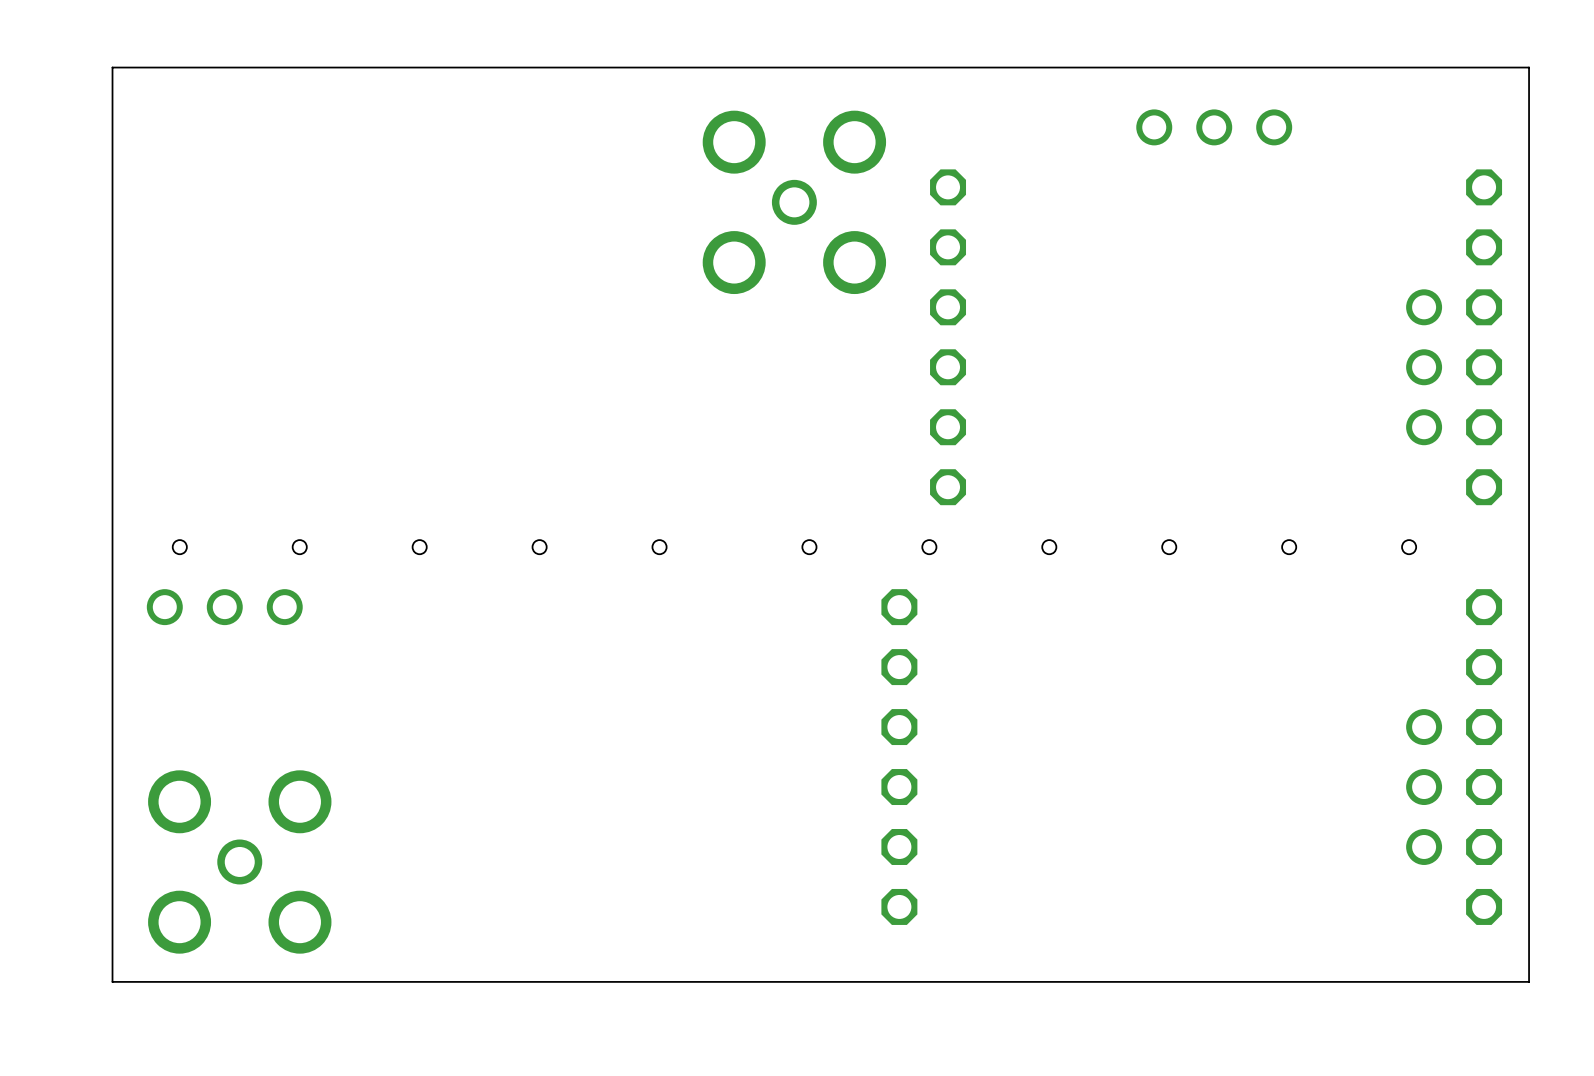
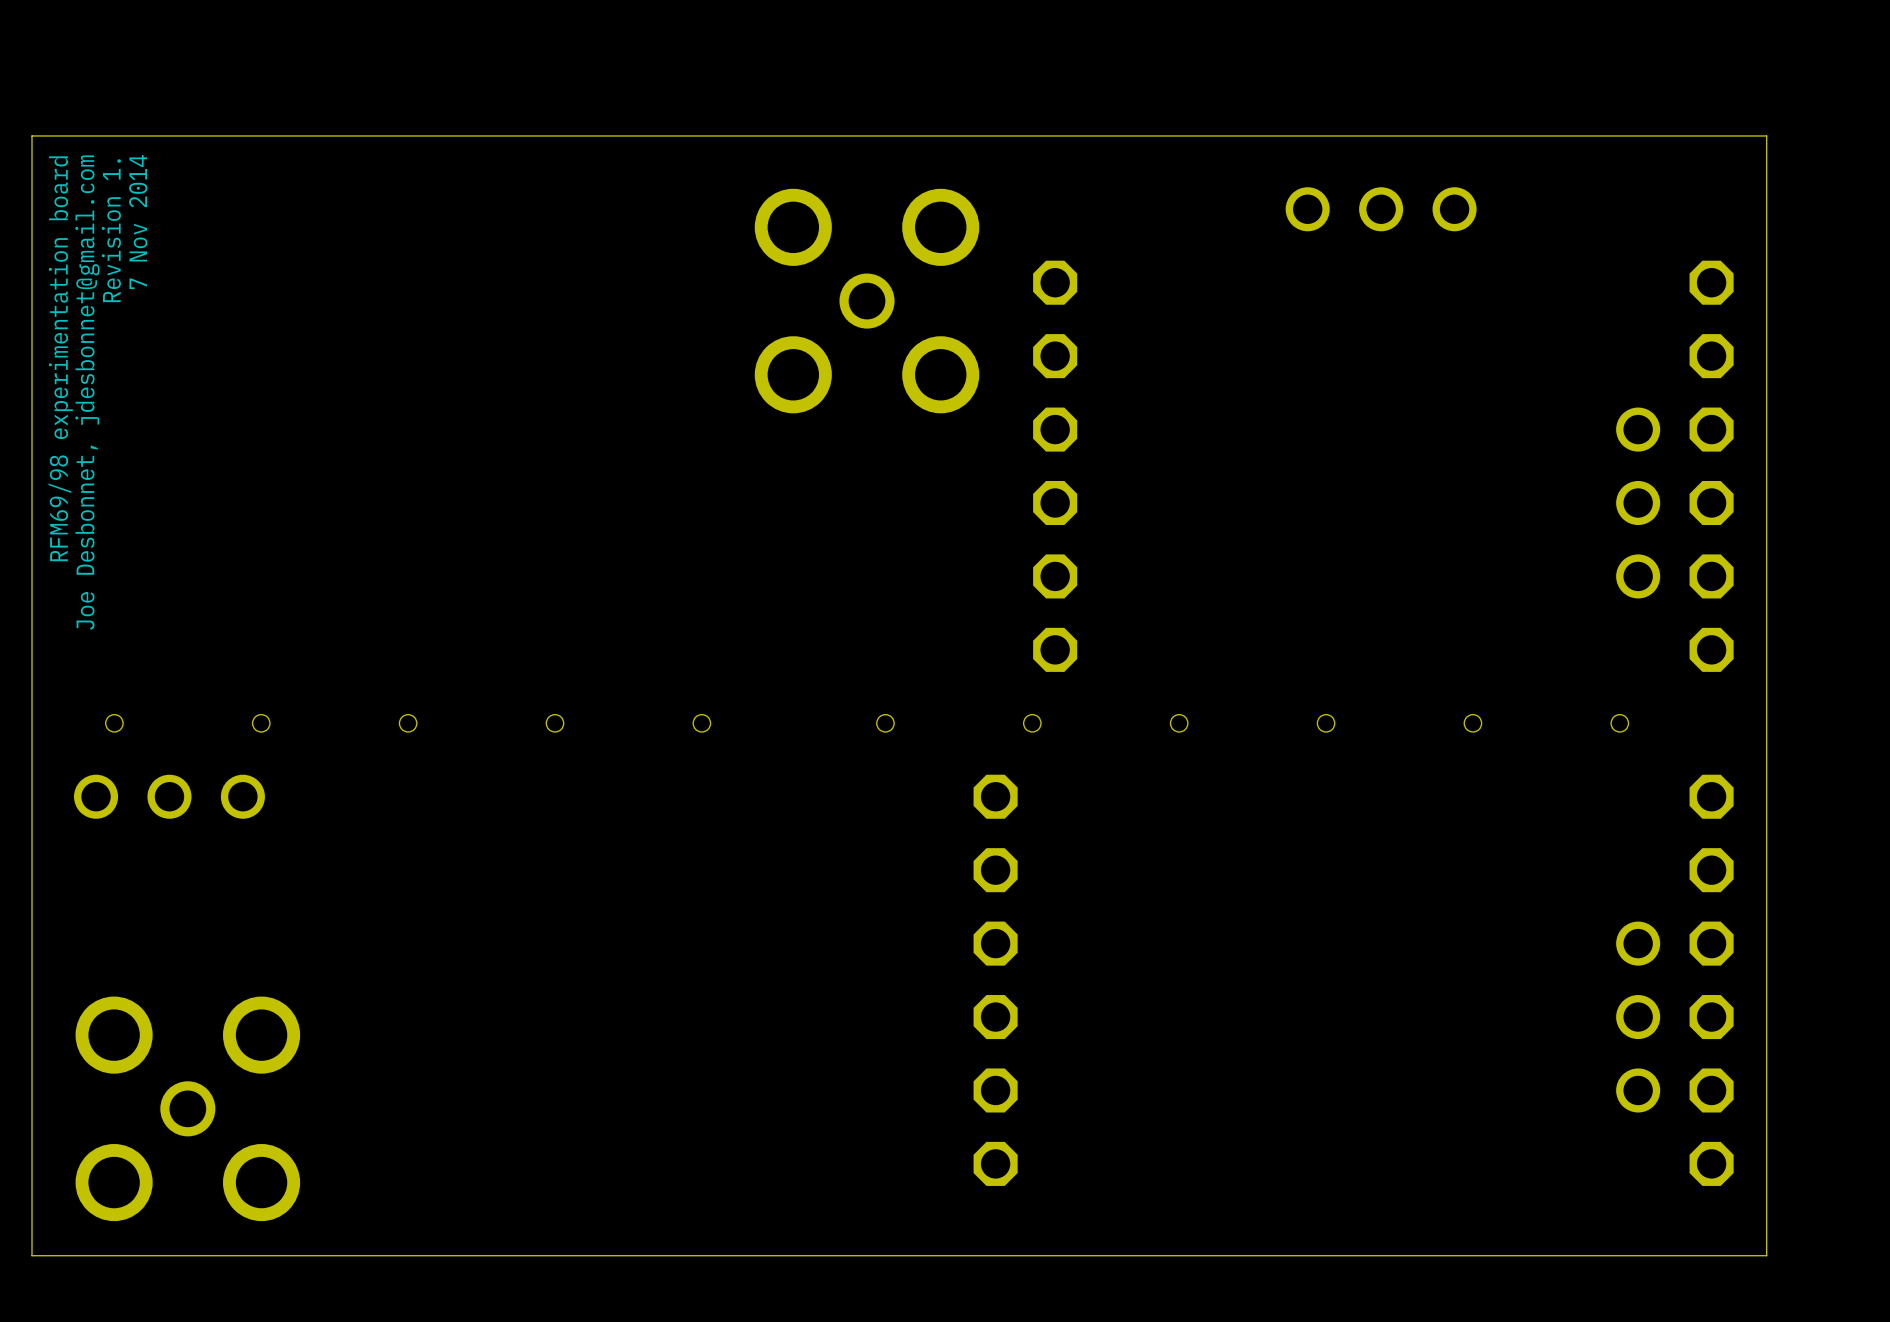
text: none -> Revision 1. (111, 230)
text: none -> 7 Nov 2014 (138, 222)
text: none -> RFM69/98 experimentation board (60, 358)
text: none -> Joe Desbonnet, jdesbonnet@gmail.com (87, 392)

